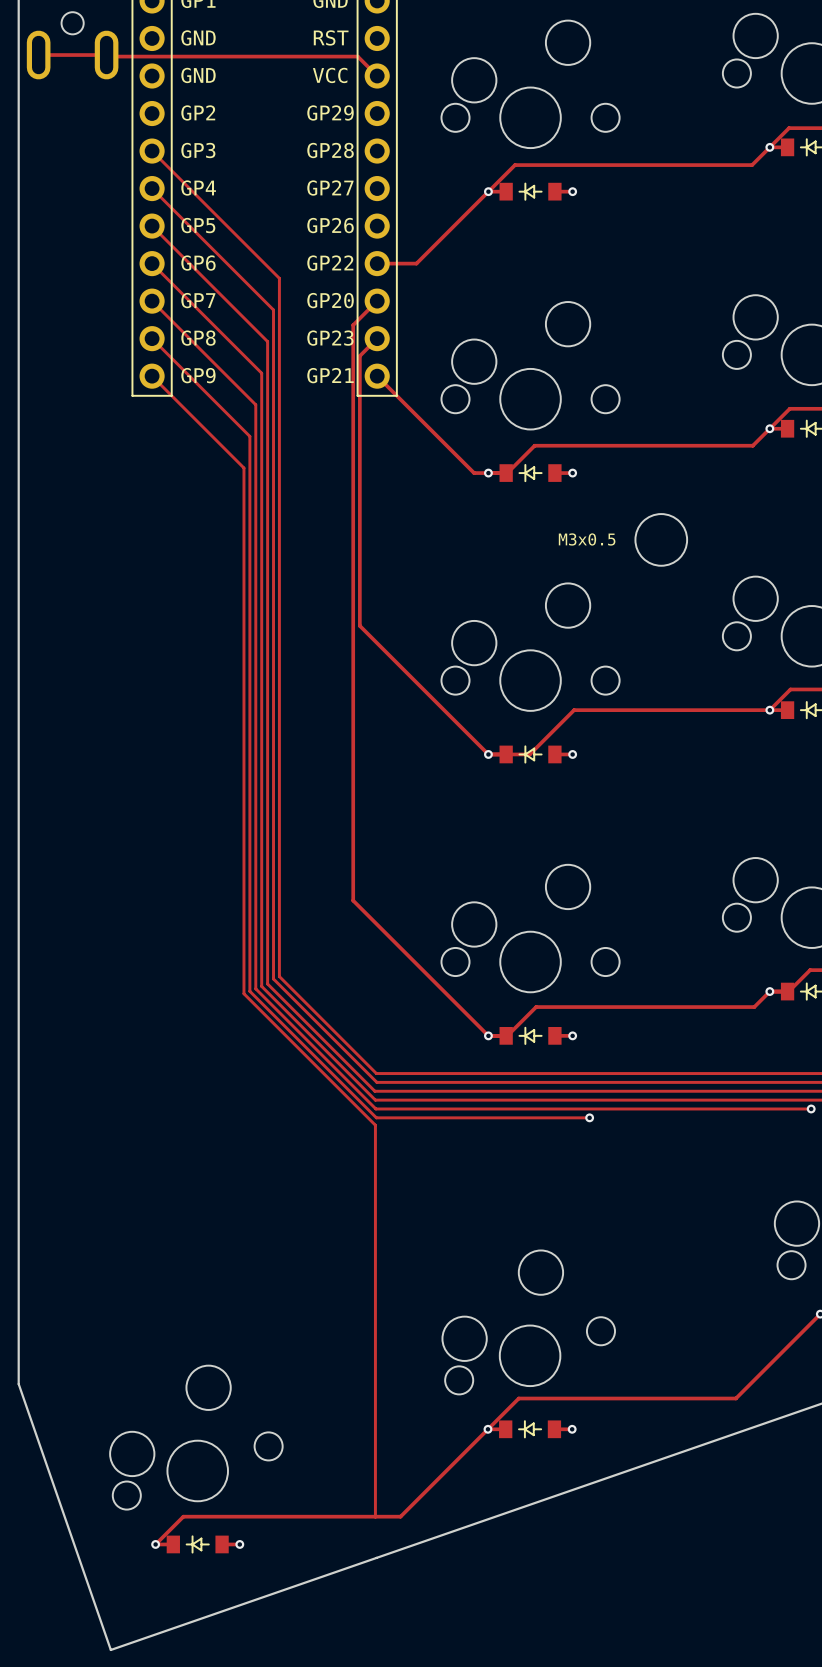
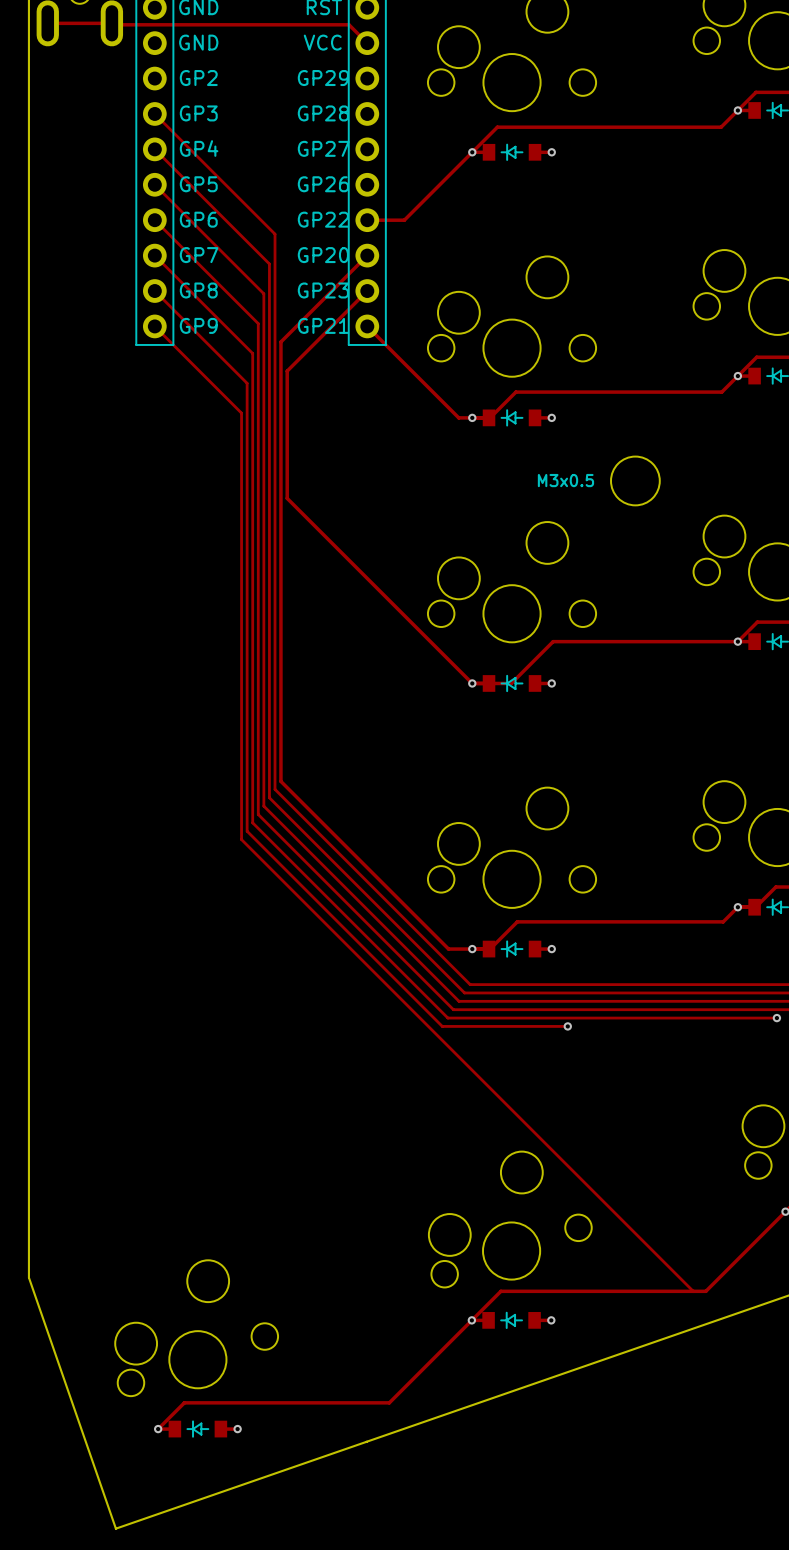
track: (353, 325) (353, 900) (488, 1035) -> (344, 278) (280, 341) (280, 781) (448, 949) (472, 949)
track: (359, 356) (359, 625) -> (350, 307) (287, 371) (287, 498) (350, 562)
track: (279, 866) (279, 976) (376, 1073) (486, 1073) -> (275, 789) (470, 984)
track: (273, 875) (273, 978) (376, 1082) (480, 1082) -> (269, 797) (464, 992)
track: (267, 884) (267, 983) (374, 1091) (474, 1091) -> (263, 806) (459, 1001)
track: (261, 893) (261, 986) (375, 1100) (468, 1100) -> (258, 814) (453, 1009)
track: (255, 902) (255, 988) (375, 1108) (462, 1108) -> (252, 822) (447, 1018)
track: (249, 911) (249, 991) (376, 1117) (456, 1117) -> (247, 831) (442, 1026)
track: (243, 919) (243, 993) (375, 1125) (375, 1516) -> (241, 839) (693, 1291)

